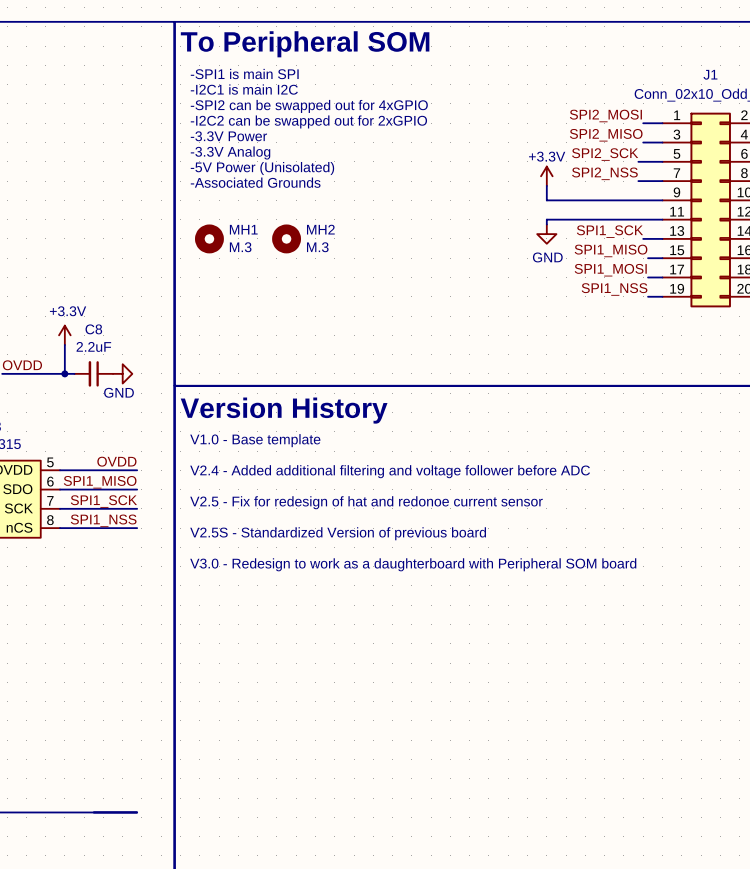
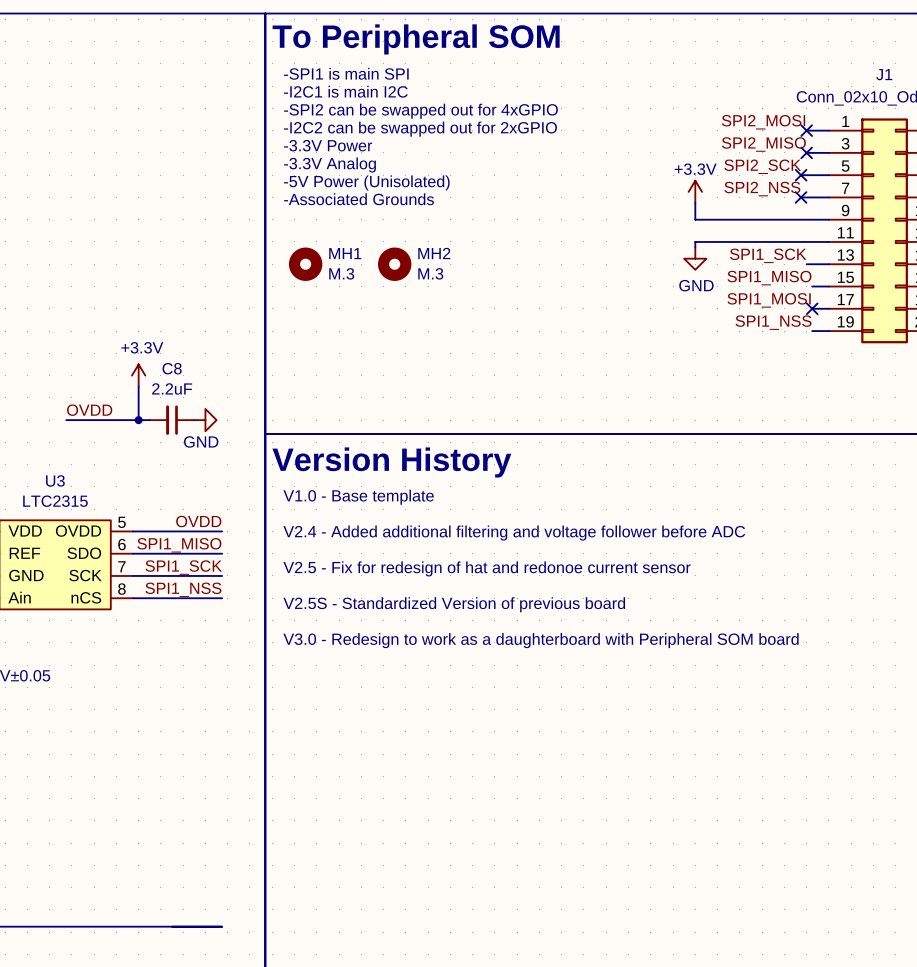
no-connect mark: none -> (806, 130)
no-connect mark: none -> (806, 152)
no-connect mark: none -> (801, 175)
no-connect mark: none -> (801, 197)
no-connect mark: none -> (812, 308)

